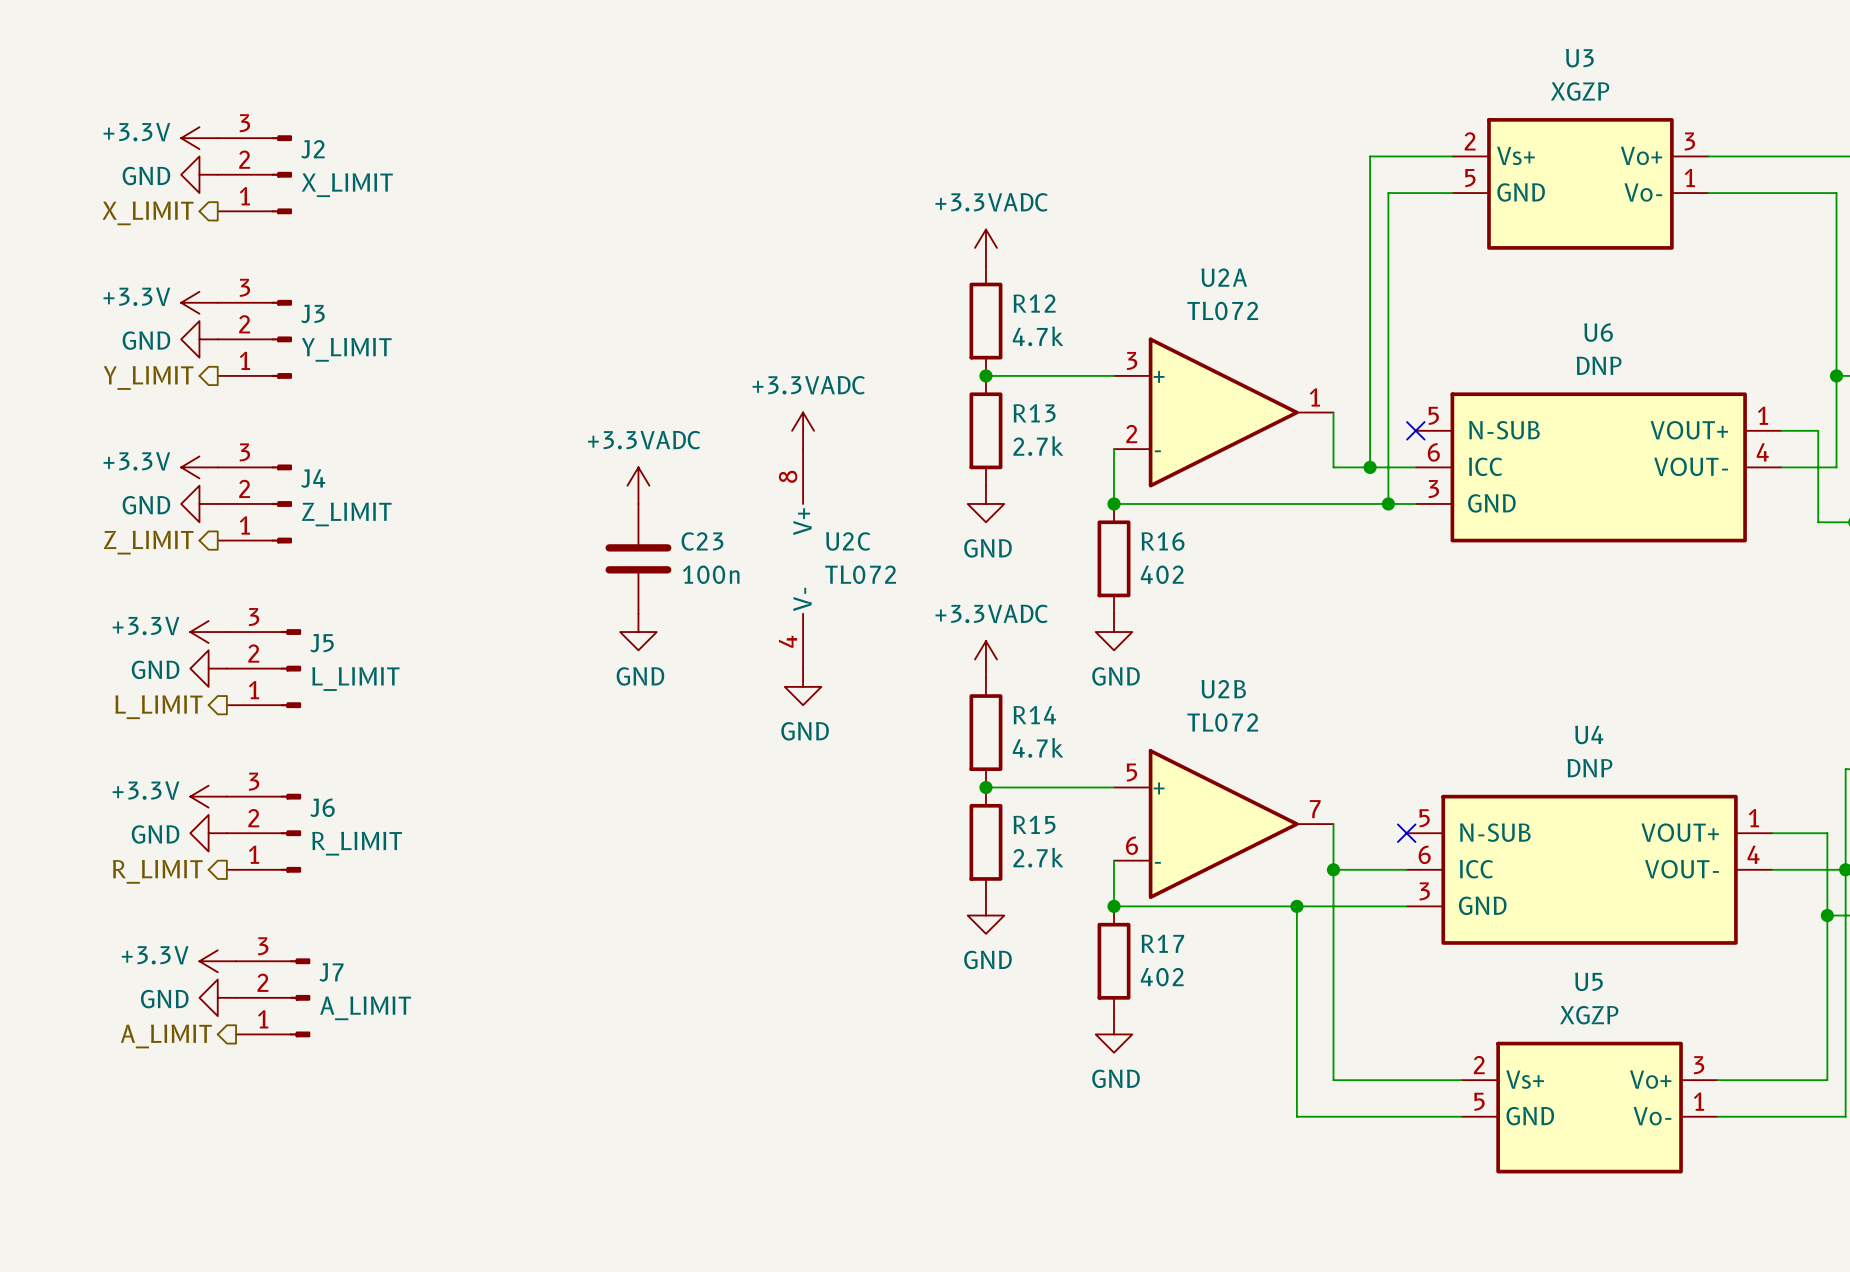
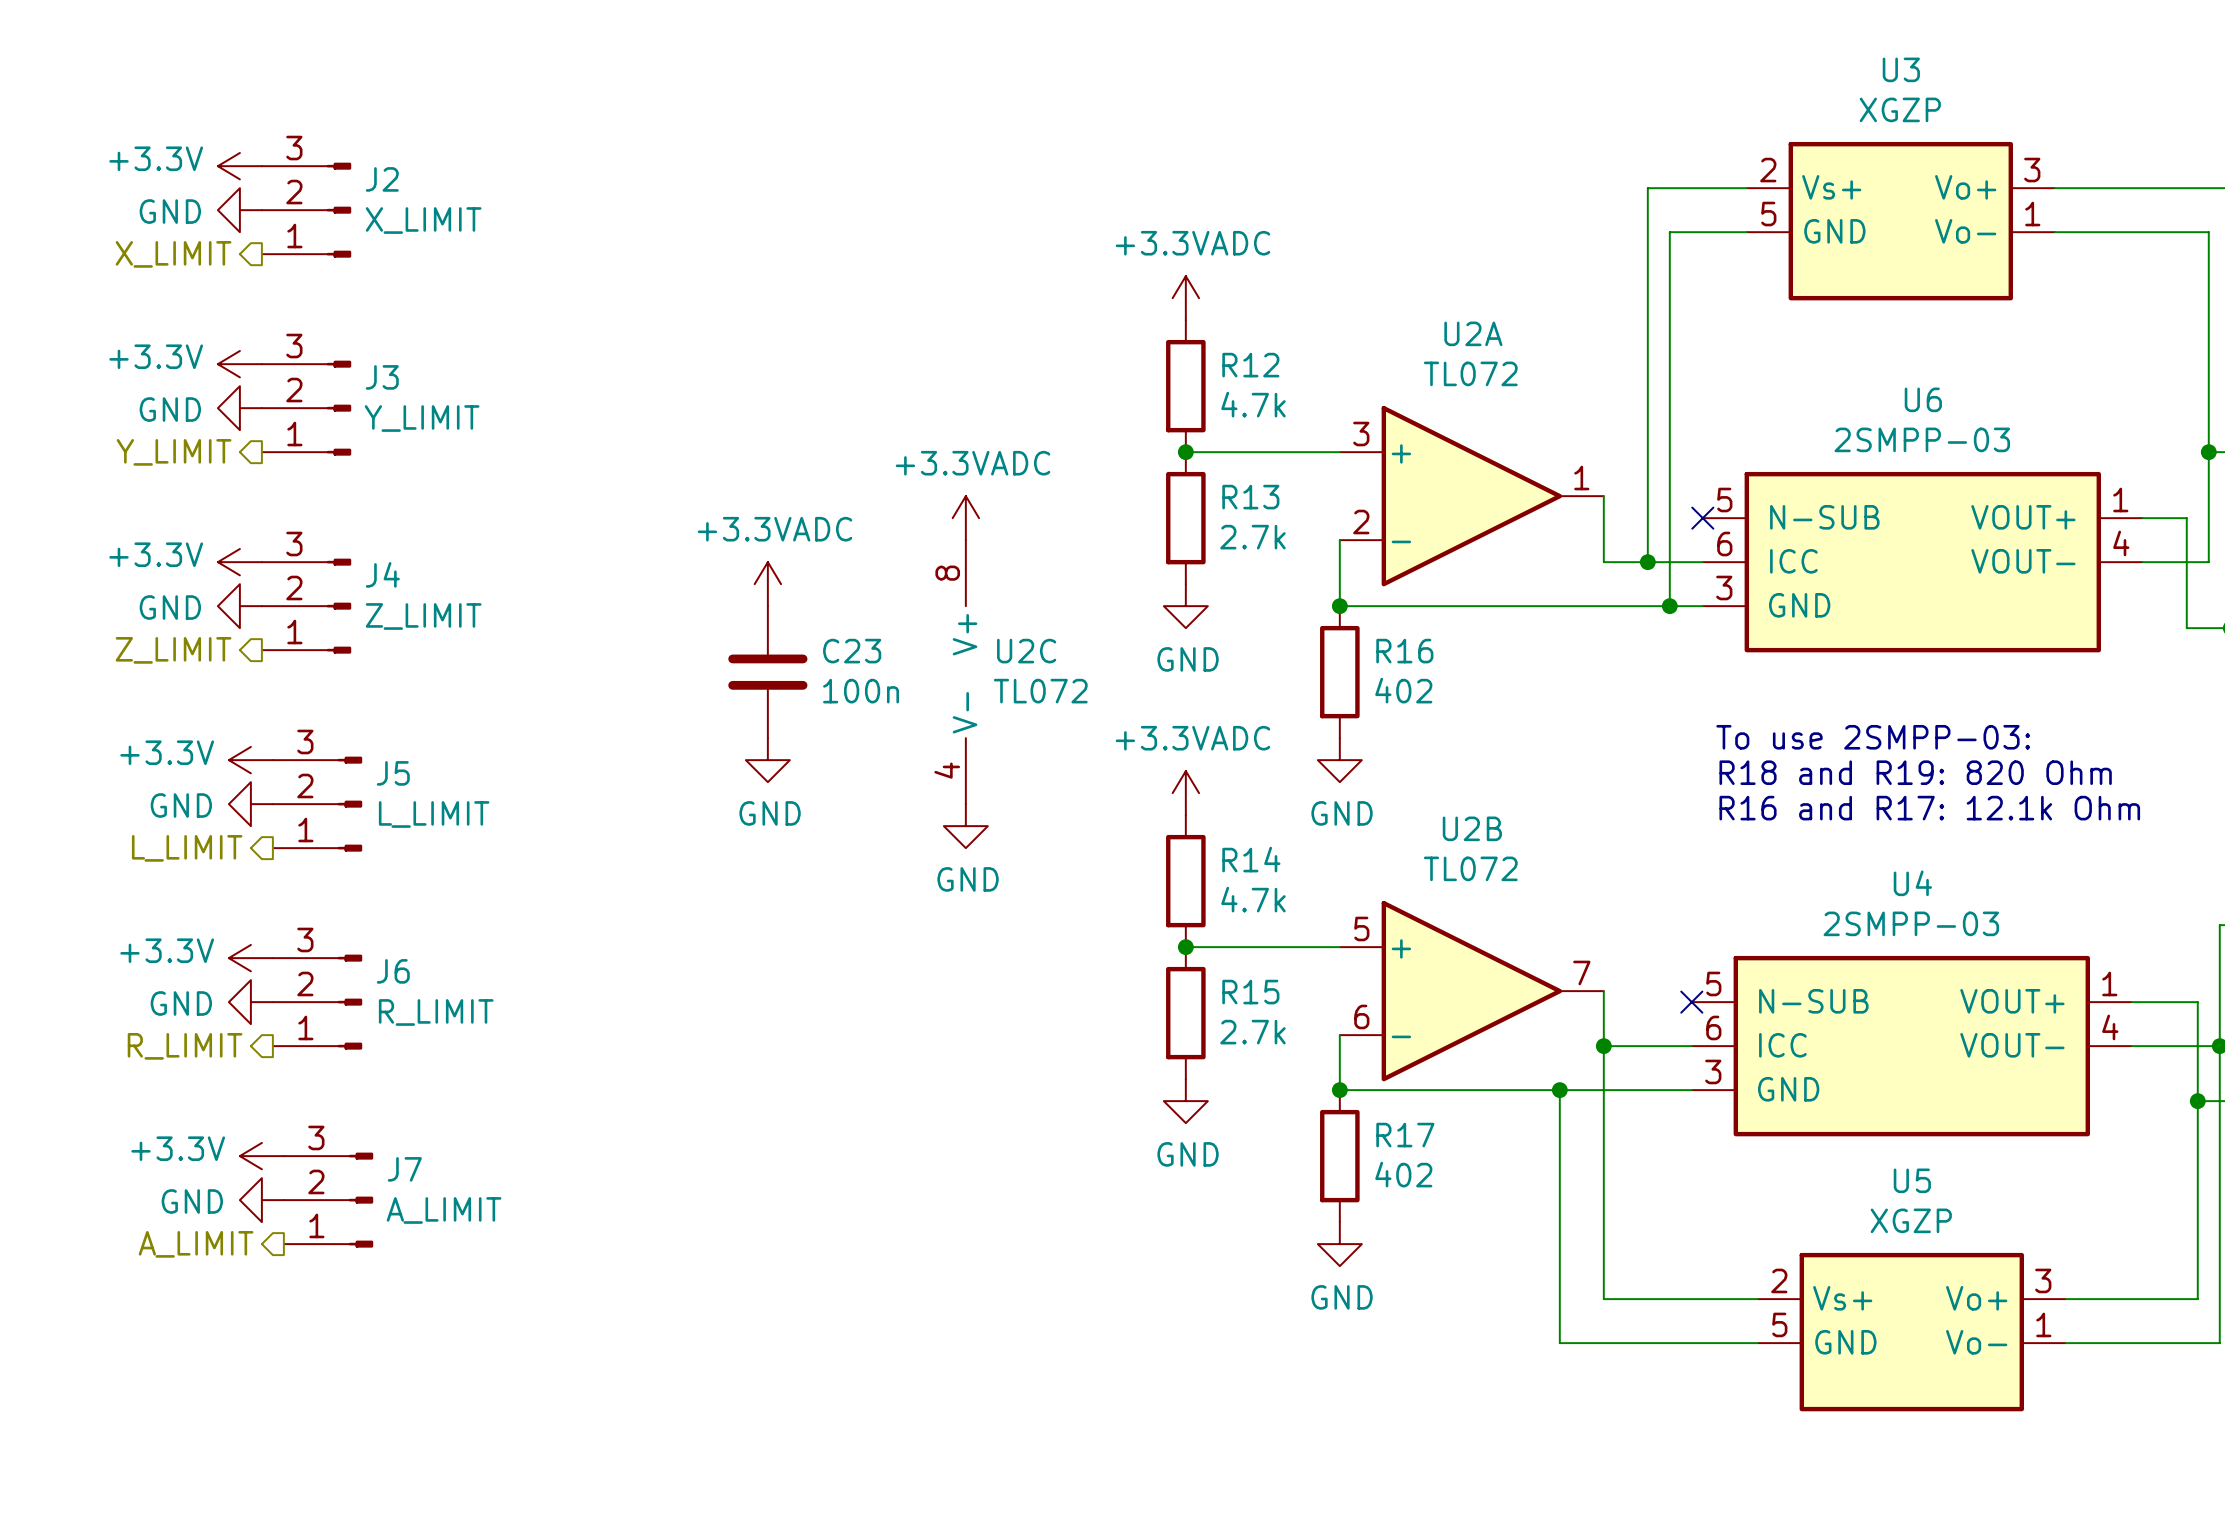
U6 value: DNP (1599, 365) -> 2SMPP-03 (1922, 439)
text: none -> To use 2SMPP-03: (1873, 737)
text: none -> R18 and R19: 820 Ohm (1915, 772)
text: none -> R16 and R17: 12.1k Ohm (1929, 808)
U4 value: DNP (1589, 768) -> 2SMPP-03 (1911, 923)

